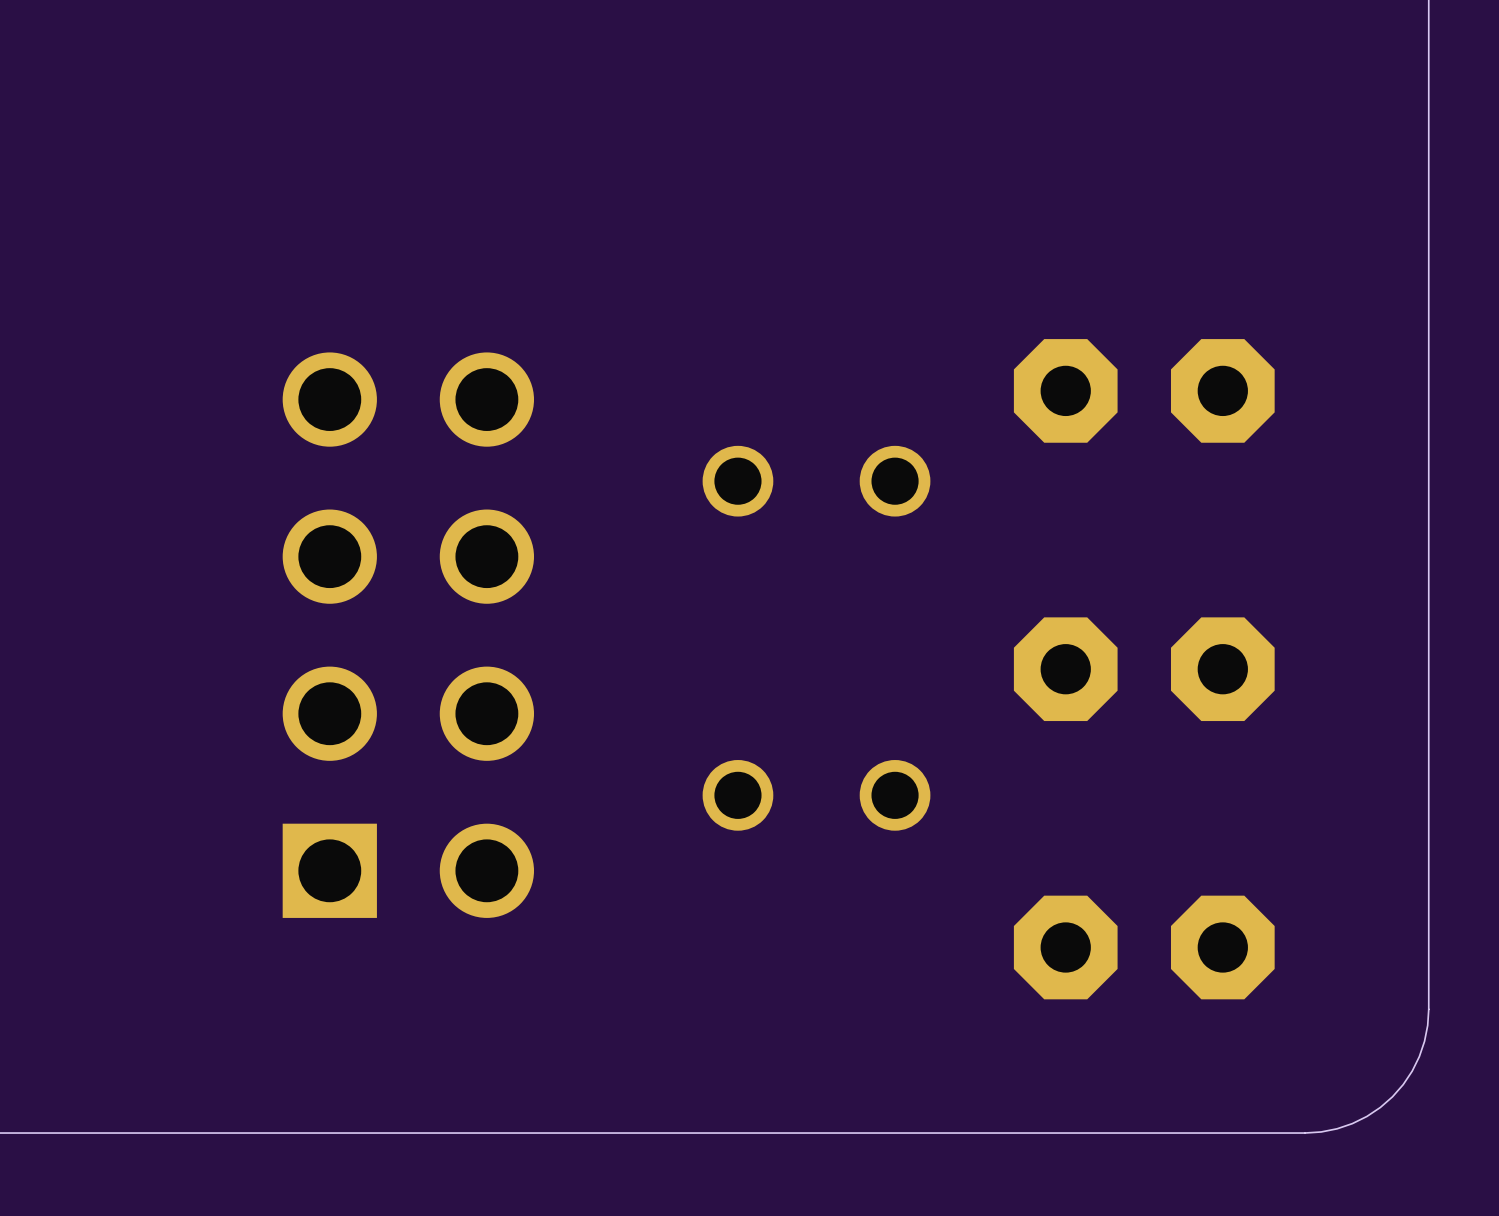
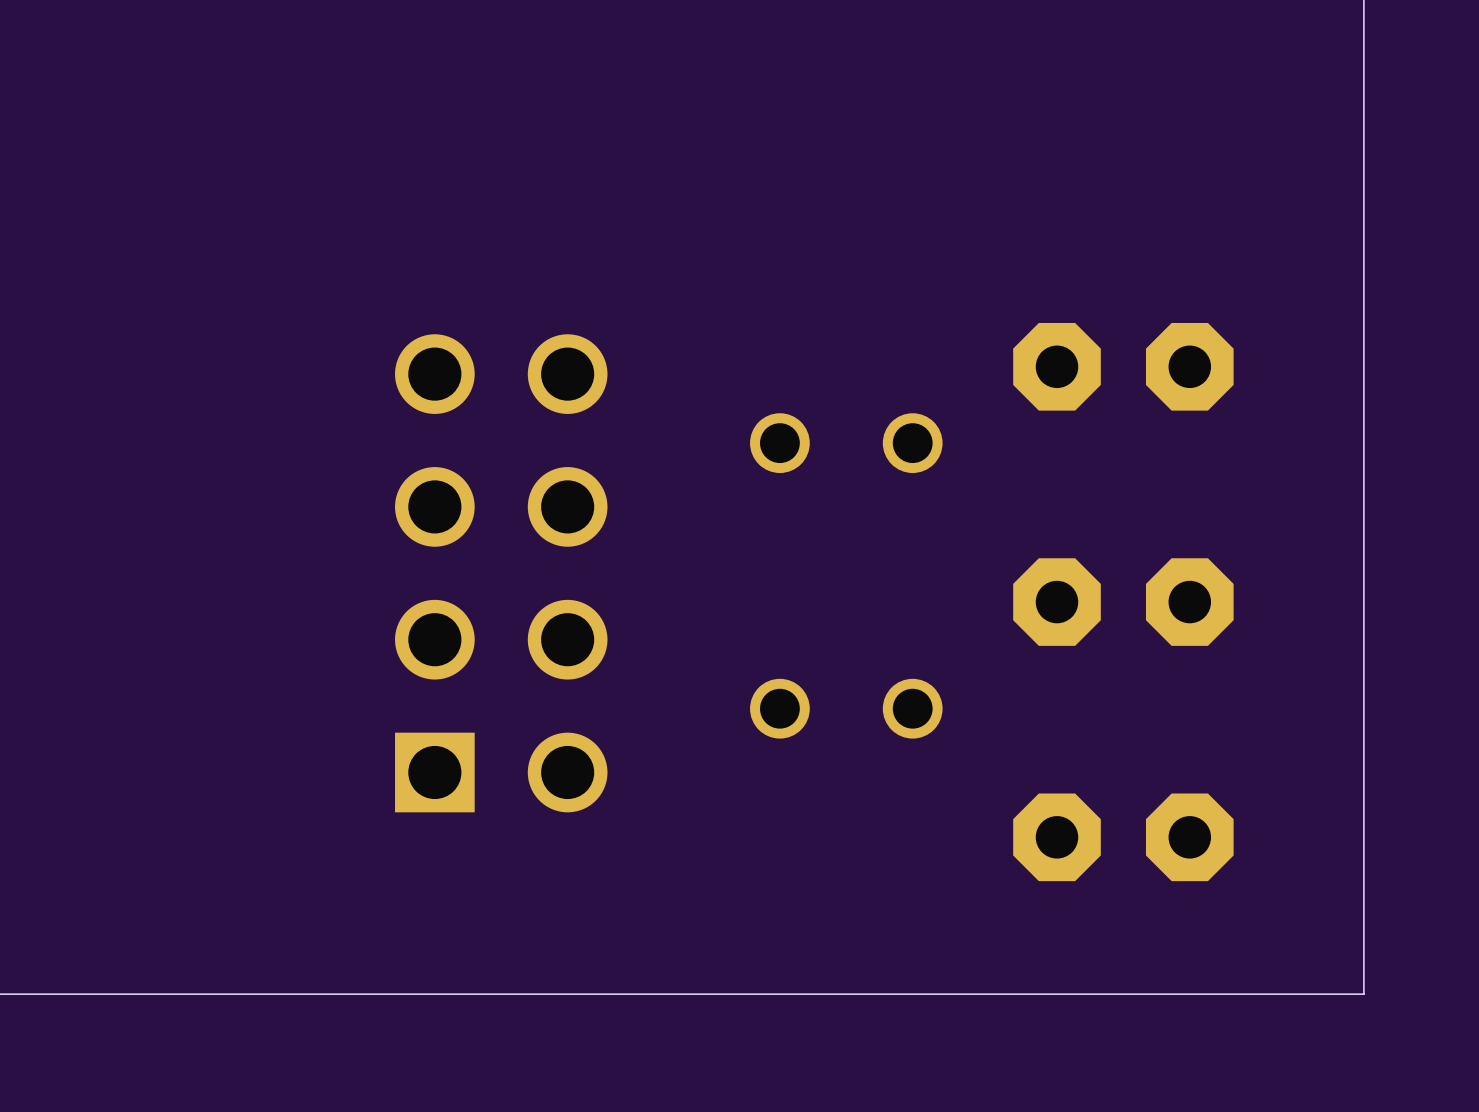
board edge: (1428, 1009) (1424, 1041) (1419, 1056) (1412, 1071) (1392, 1096) (1366, 1116) (1352, 1123) (1337, 1128) (1305, 1133) -> (1363, 889) (1363, 994) (1259, 994)

